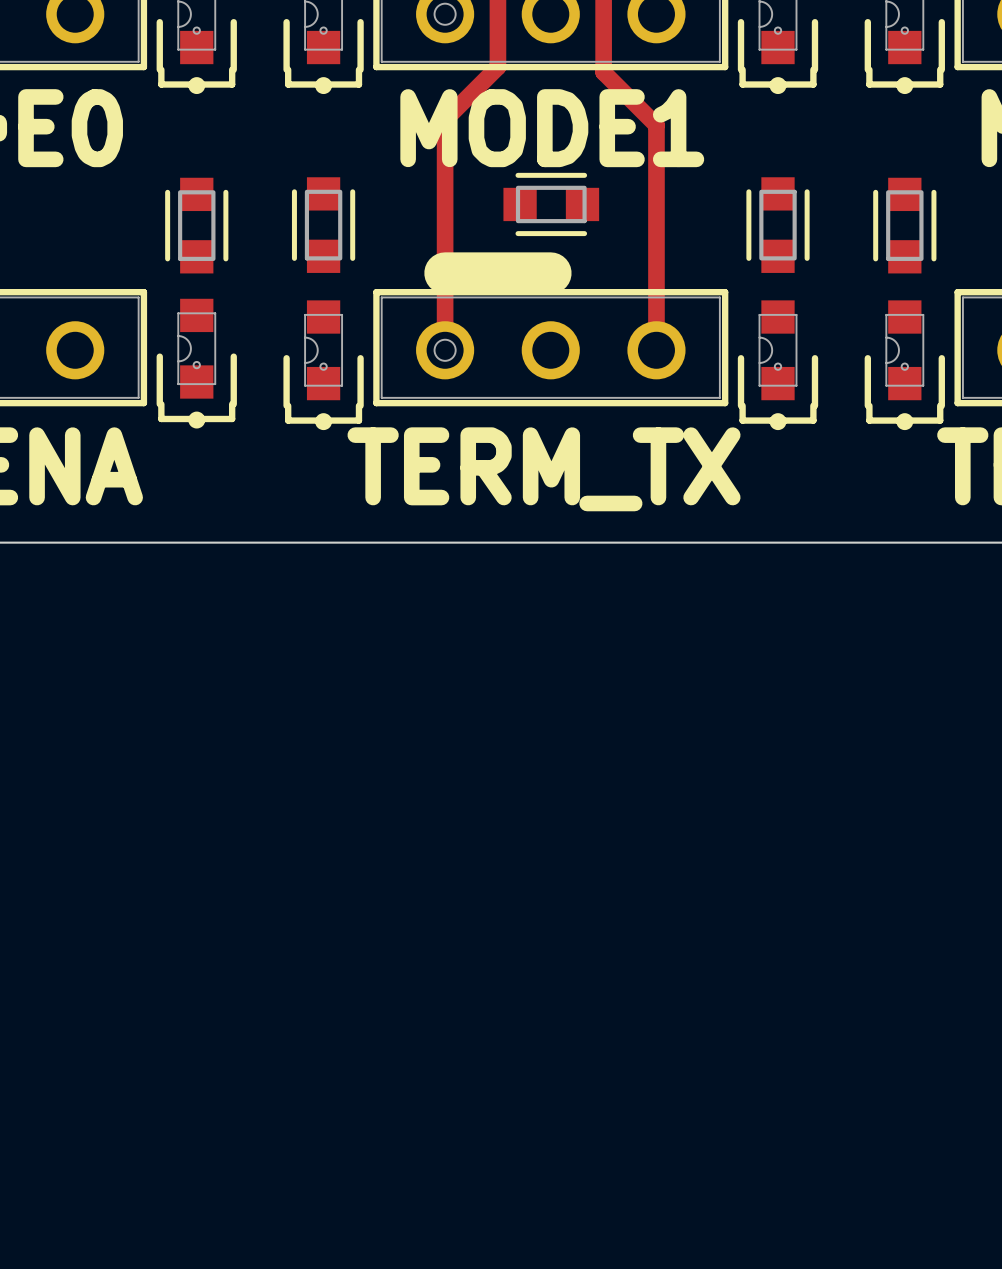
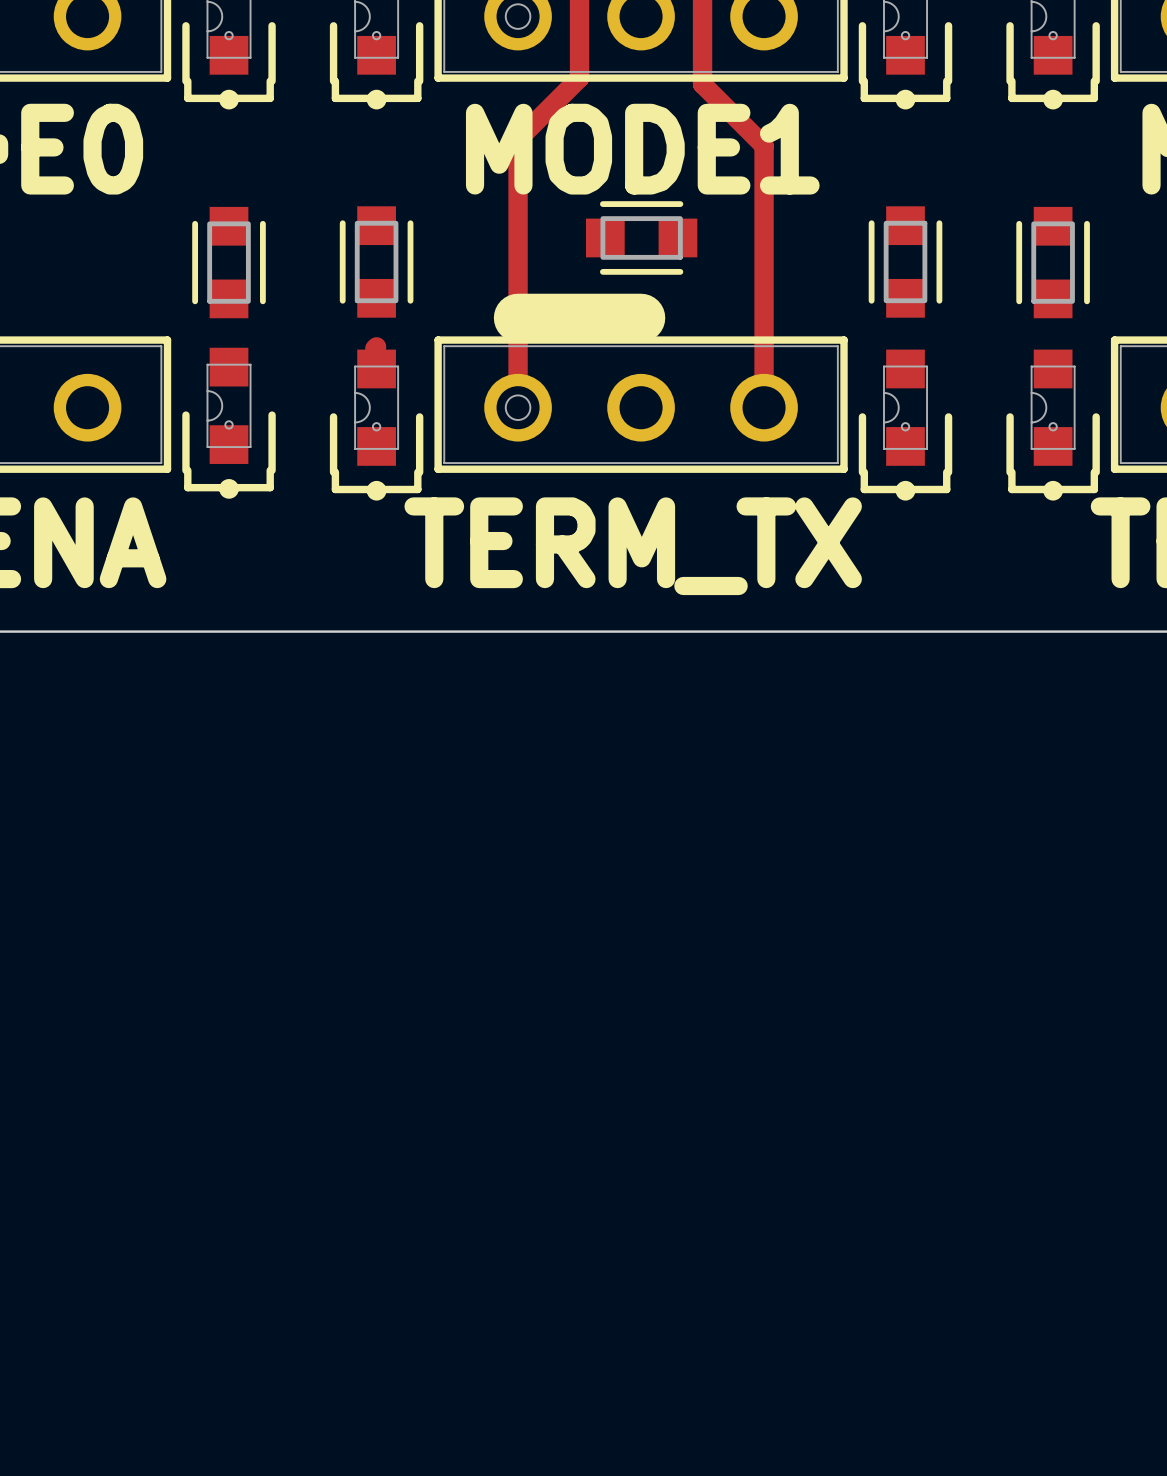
track: none -> (376, 346) (374, 348)

